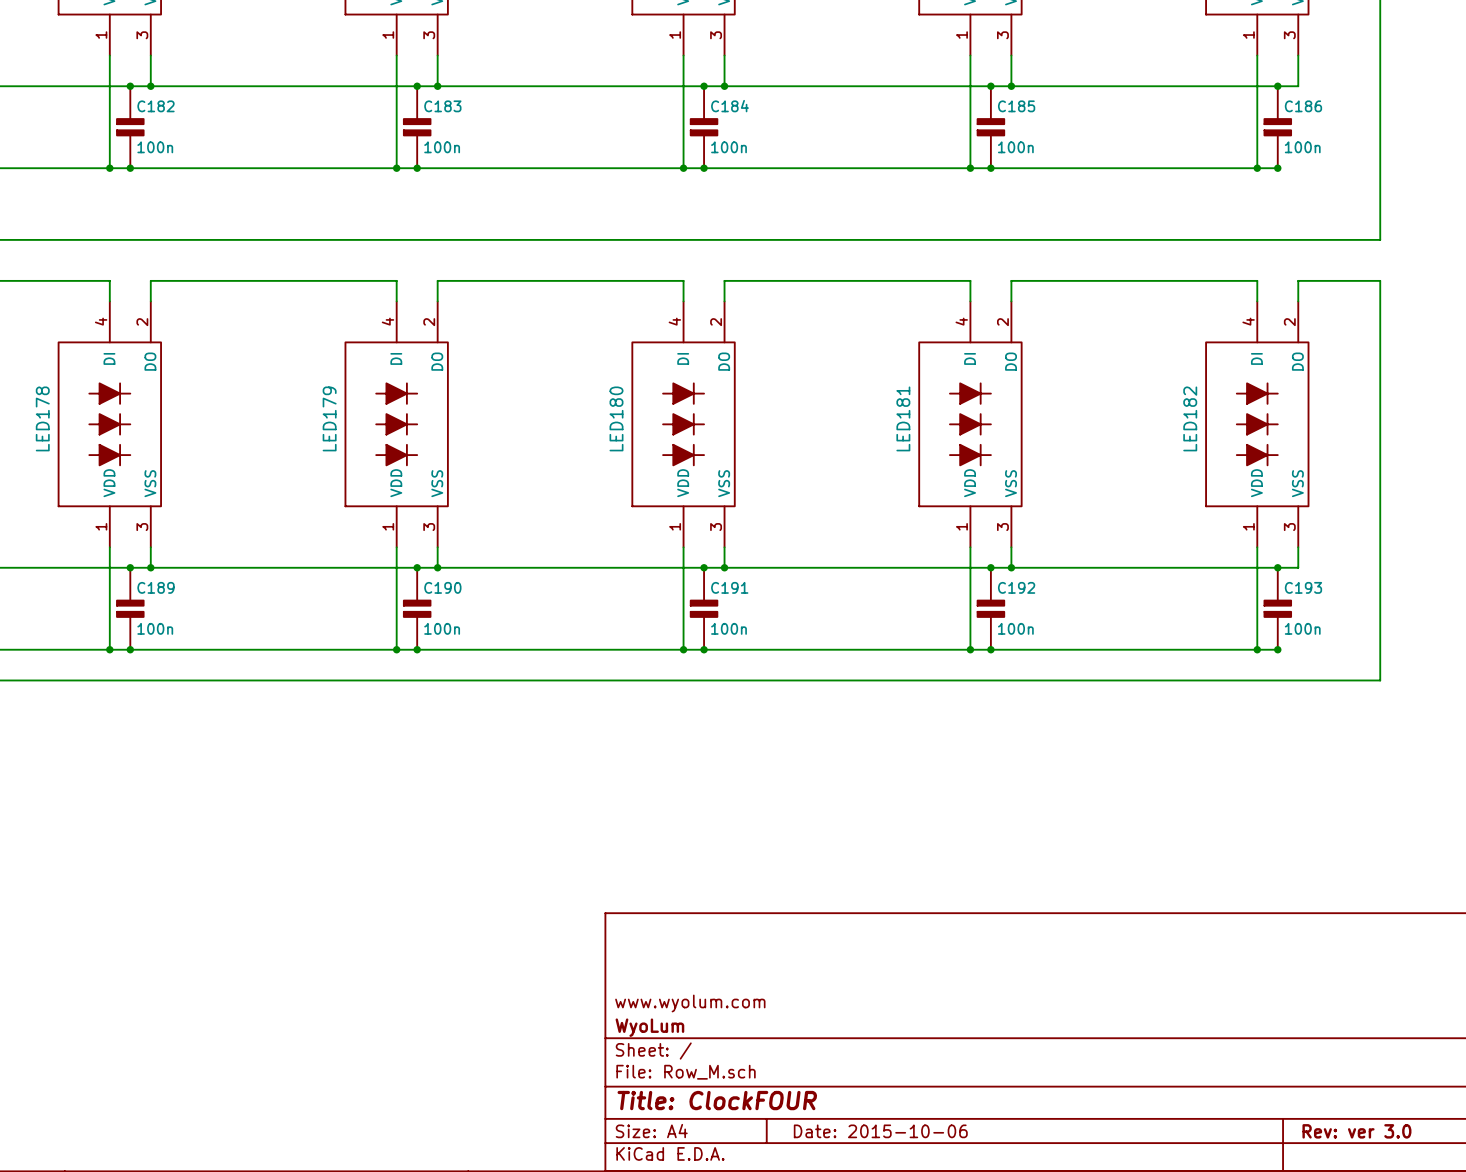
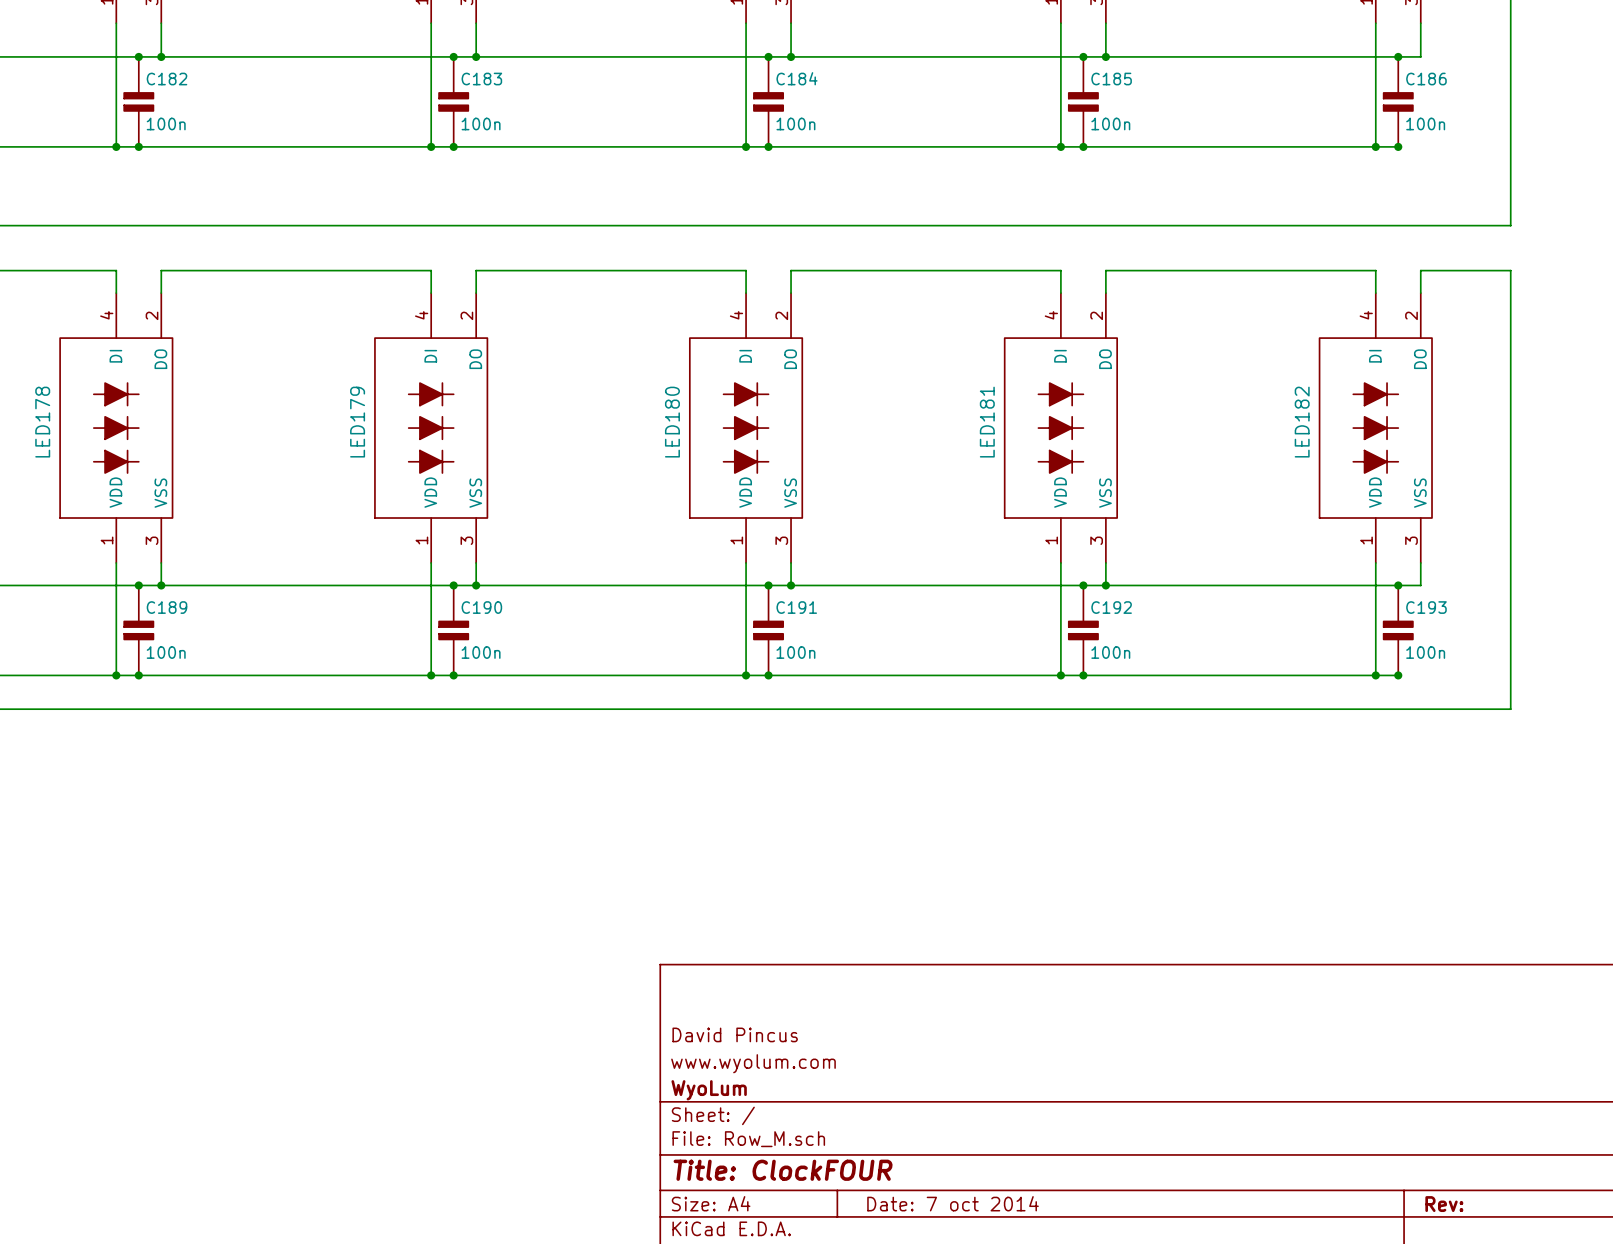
title block: none -> David Pincus (735, 1034)
title block: Date: 2015-10-06 (880, 1131) -> Date: 7 oct 2014 (953, 1203)
title block: Rev: ver 3.0 (1356, 1131) -> Rev: (1444, 1204)

